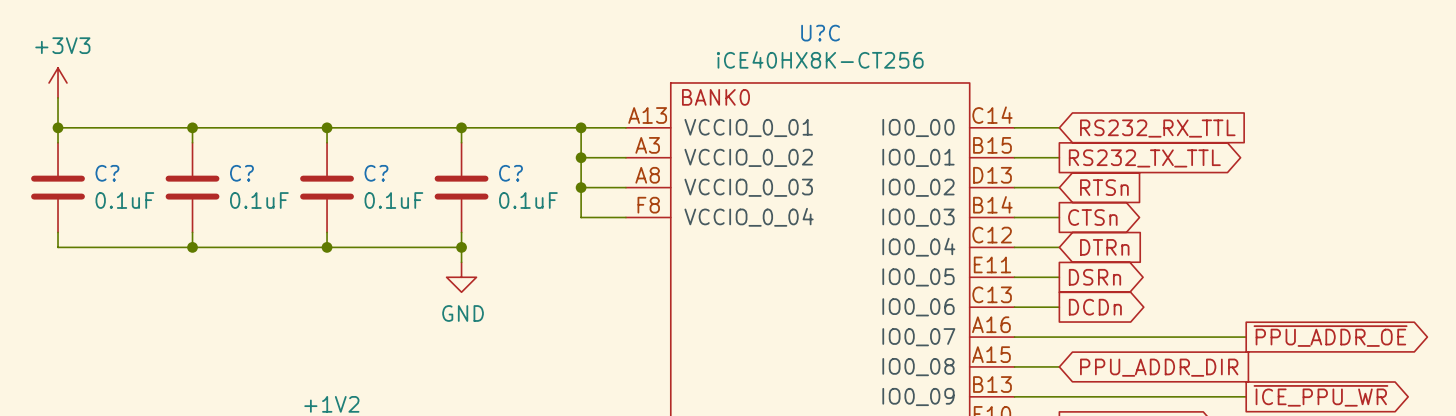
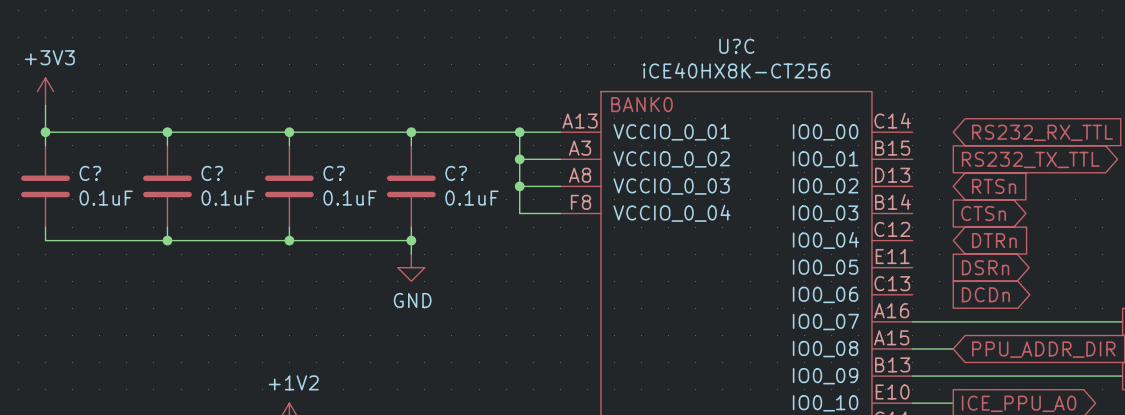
wire: (1014, 127) (1059, 127) -> none
wire: (1014, 157) (1059, 157) -> none
wire: (1014, 187) (1059, 187) -> none
wire: (1014, 217) (1059, 217) -> none
wire: (1014, 247) (1059, 247) -> none
wire: (1014, 277) (1059, 277) -> none
wire: (1014, 307) (1059, 307) -> none

